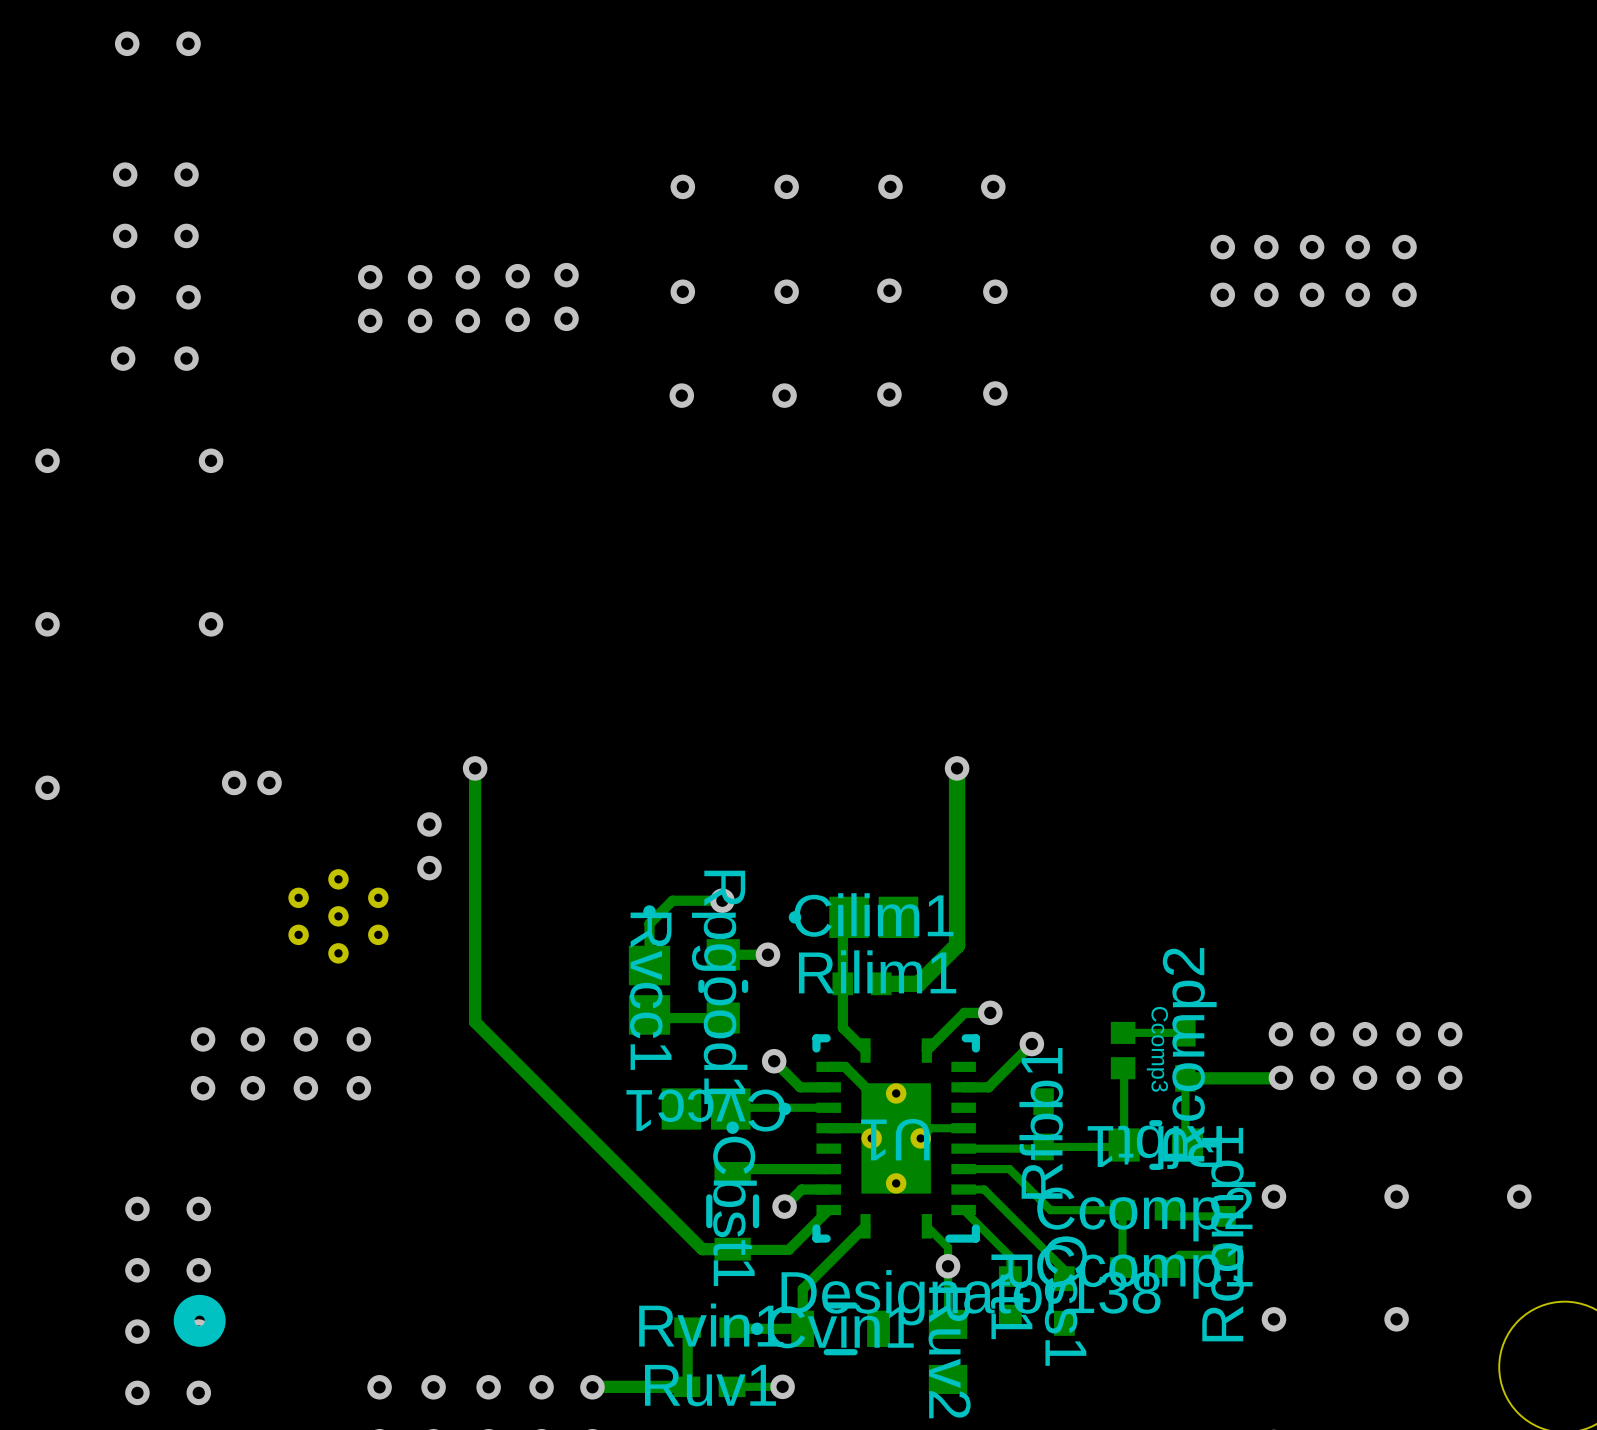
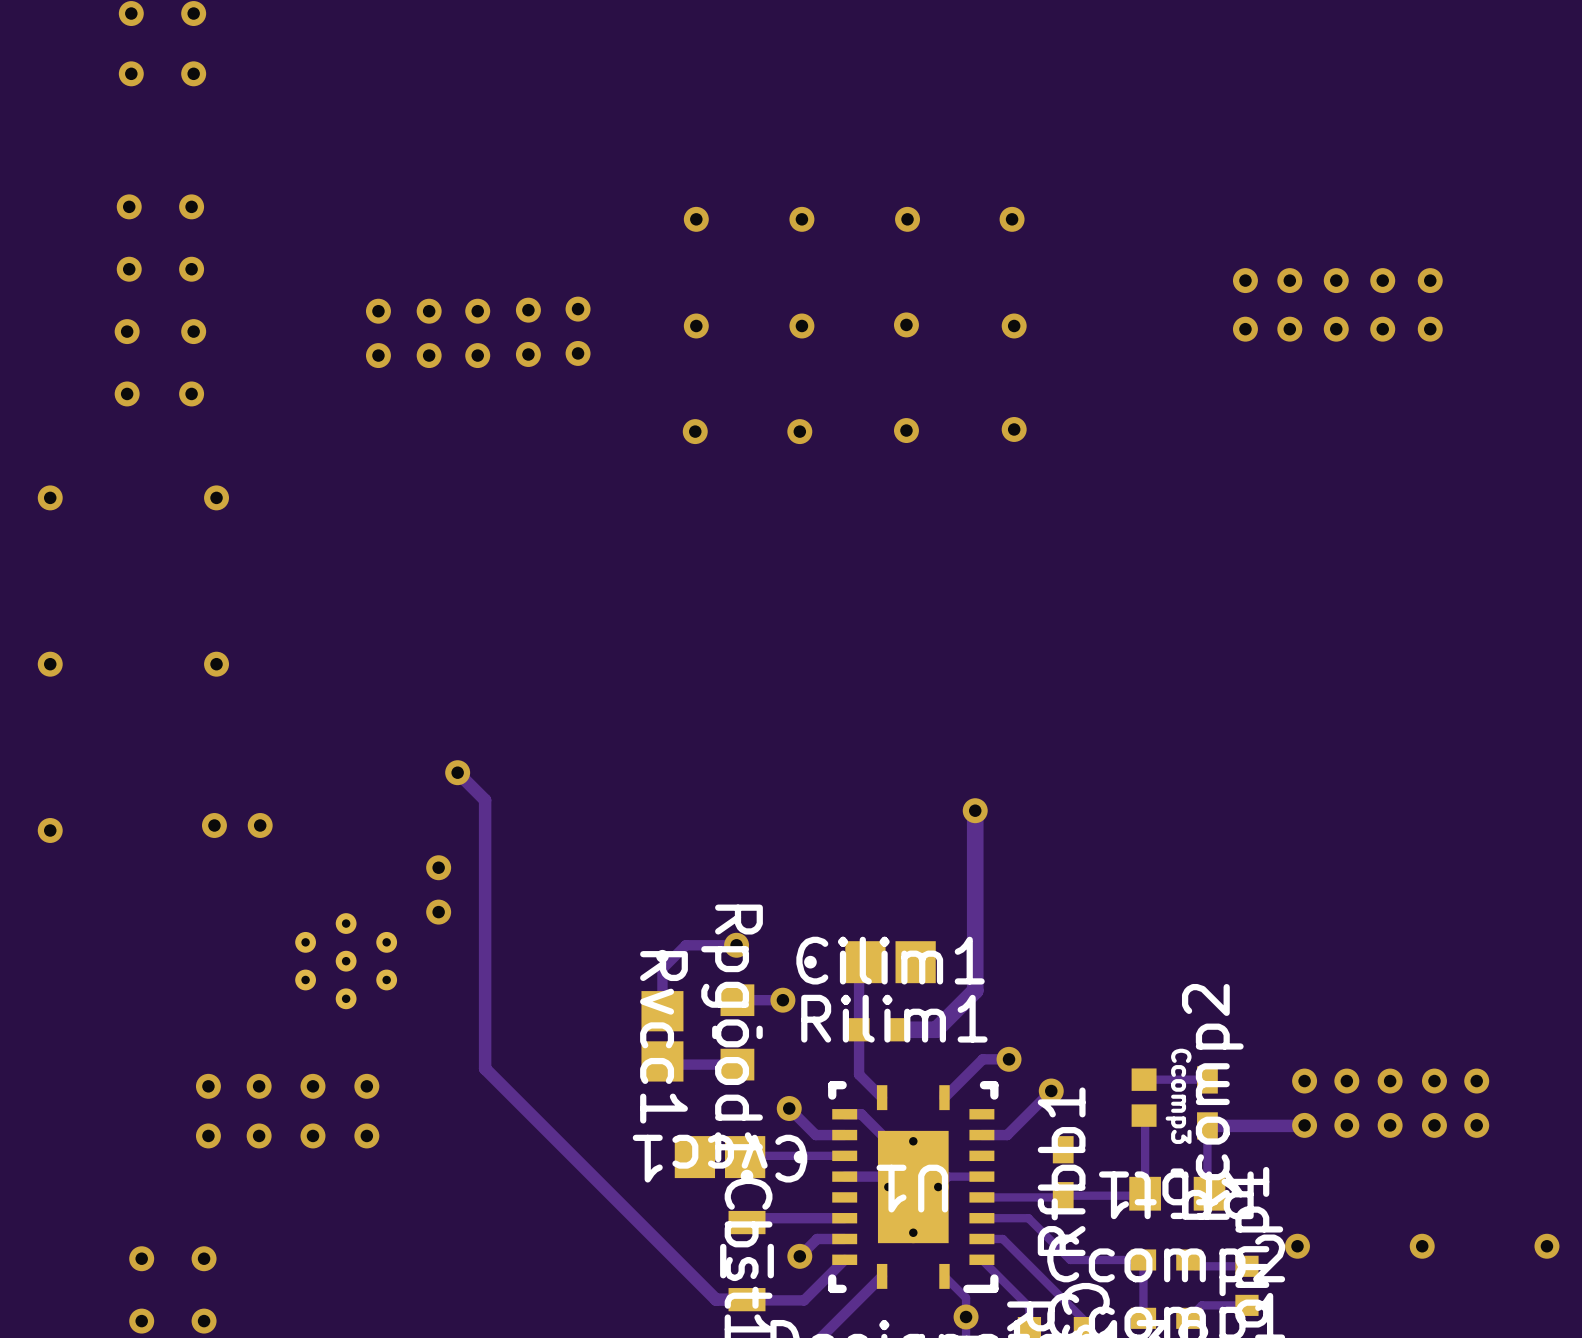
track: none -> (457, 772) (485, 800) (485, 810)
via position: (475, 768) -> (457, 772)
via: none -> (214, 825)
via: (234, 782) -> none
via: none -> (260, 825)
via: (269, 782) -> none

